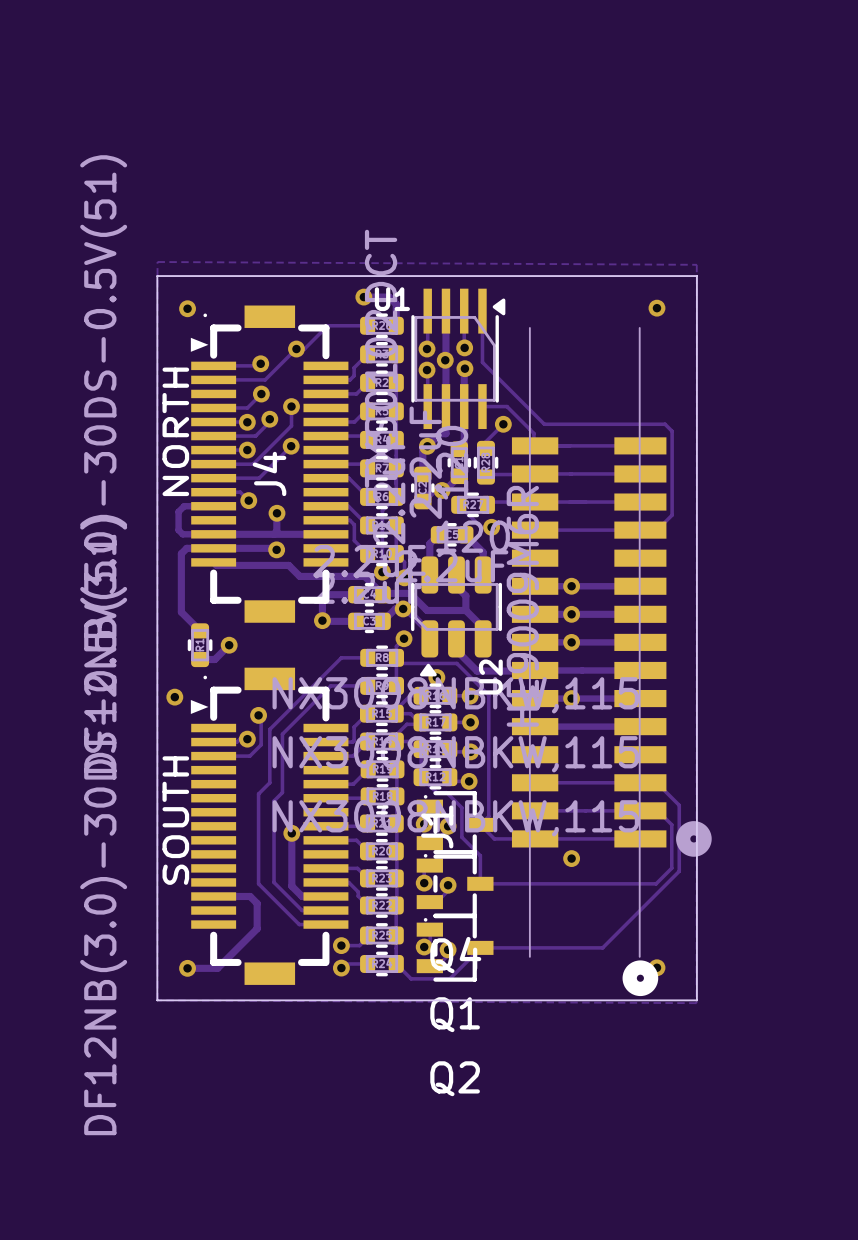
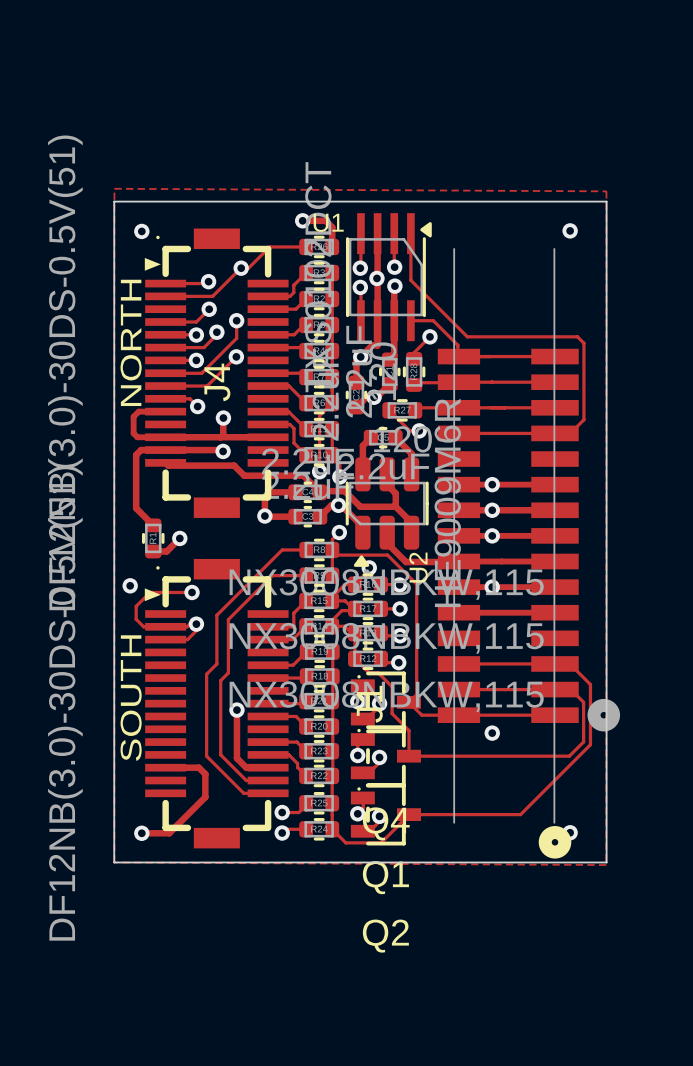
track: none -> (192, 592) (150, 592) (136, 606) (136, 619) (143, 626) (165, 626)
track: (258, 715) (261, 717) (261, 744) (249, 756) (237, 756) -> (200, 621) (200, 627) (187, 639)
via position: (258, 715) -> (192, 592)

